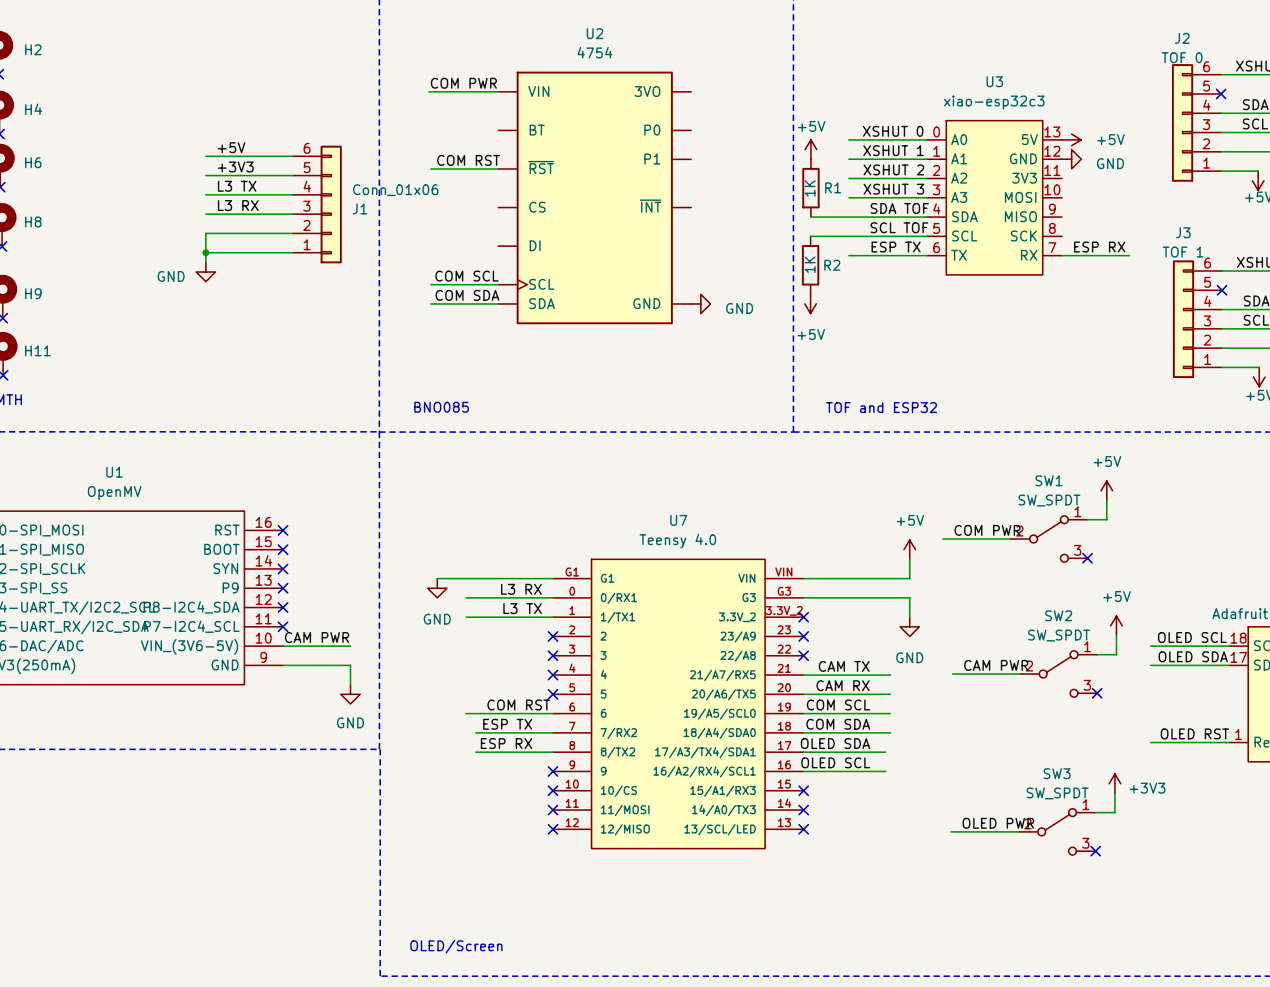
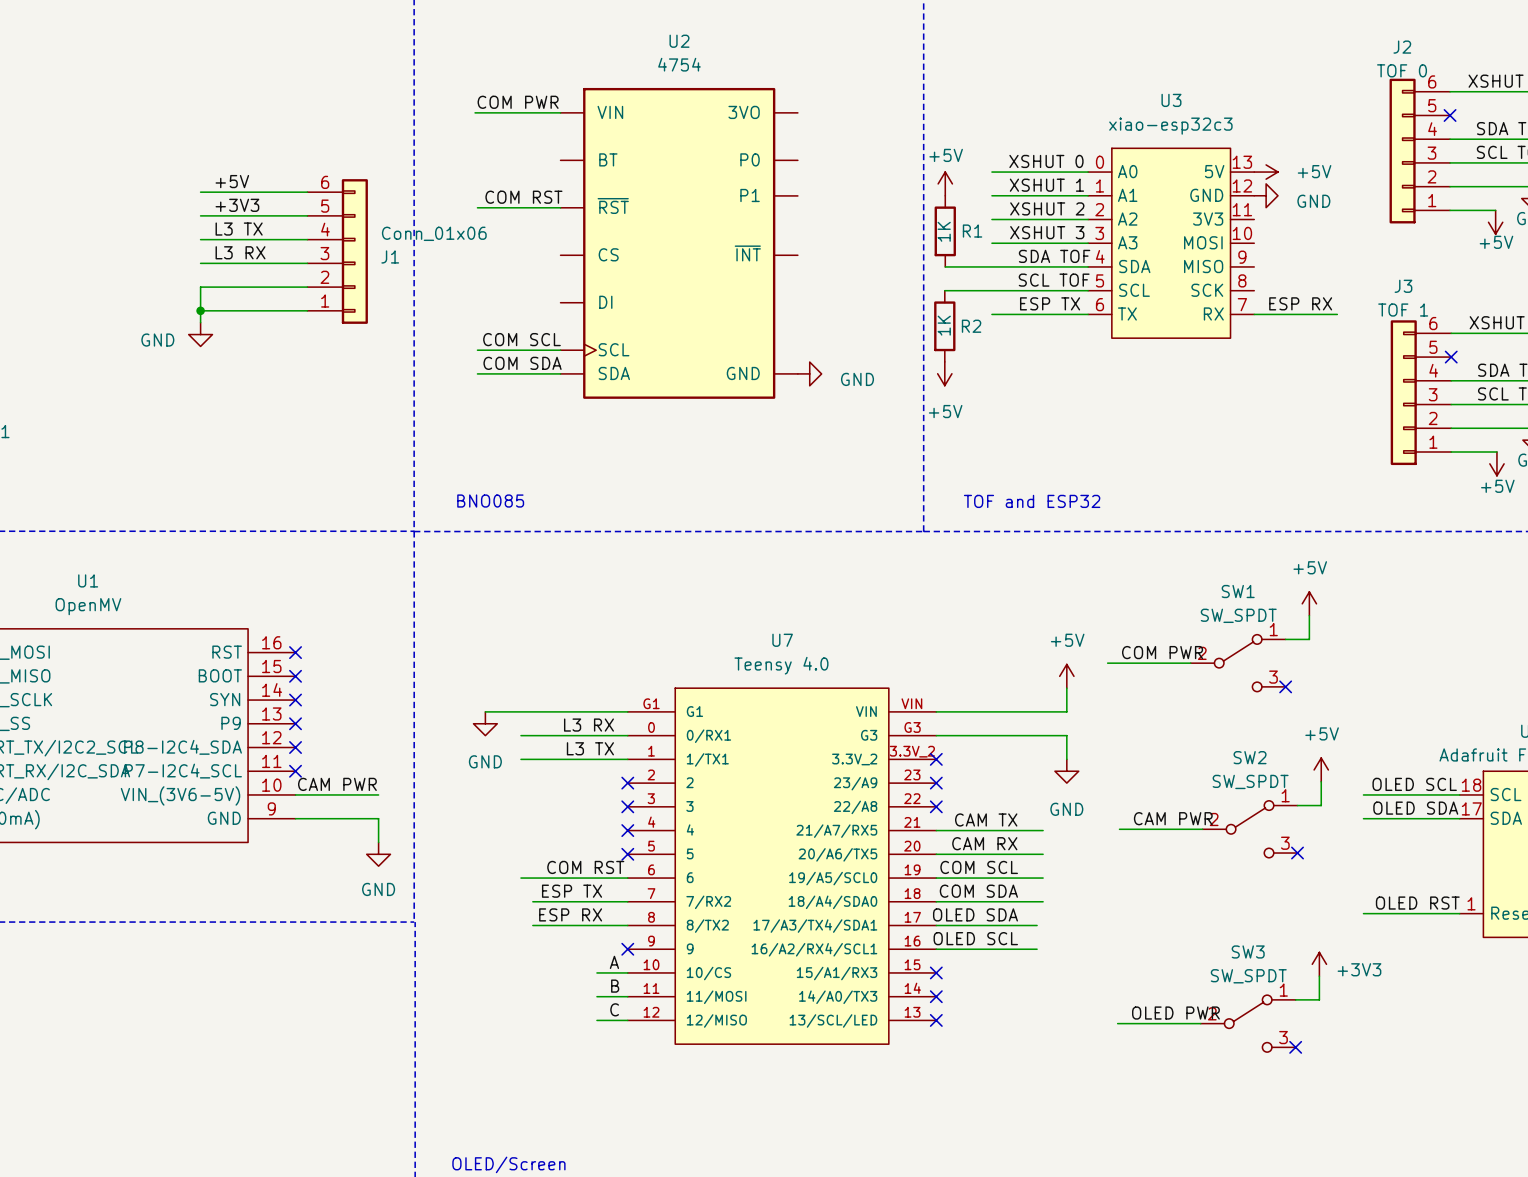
label: none -> A (614, 962)
wire: none -> (596, 972) (627, 972)
no-connect mark: (552, 790) -> none
label: none -> B (615, 986)
wire: none -> (596, 996) (627, 996)
no-connect mark: (552, 810) -> none
label: none -> C (614, 1009)
wire: none -> (596, 1020) (627, 1020)
no-connect mark: (552, 829) -> none

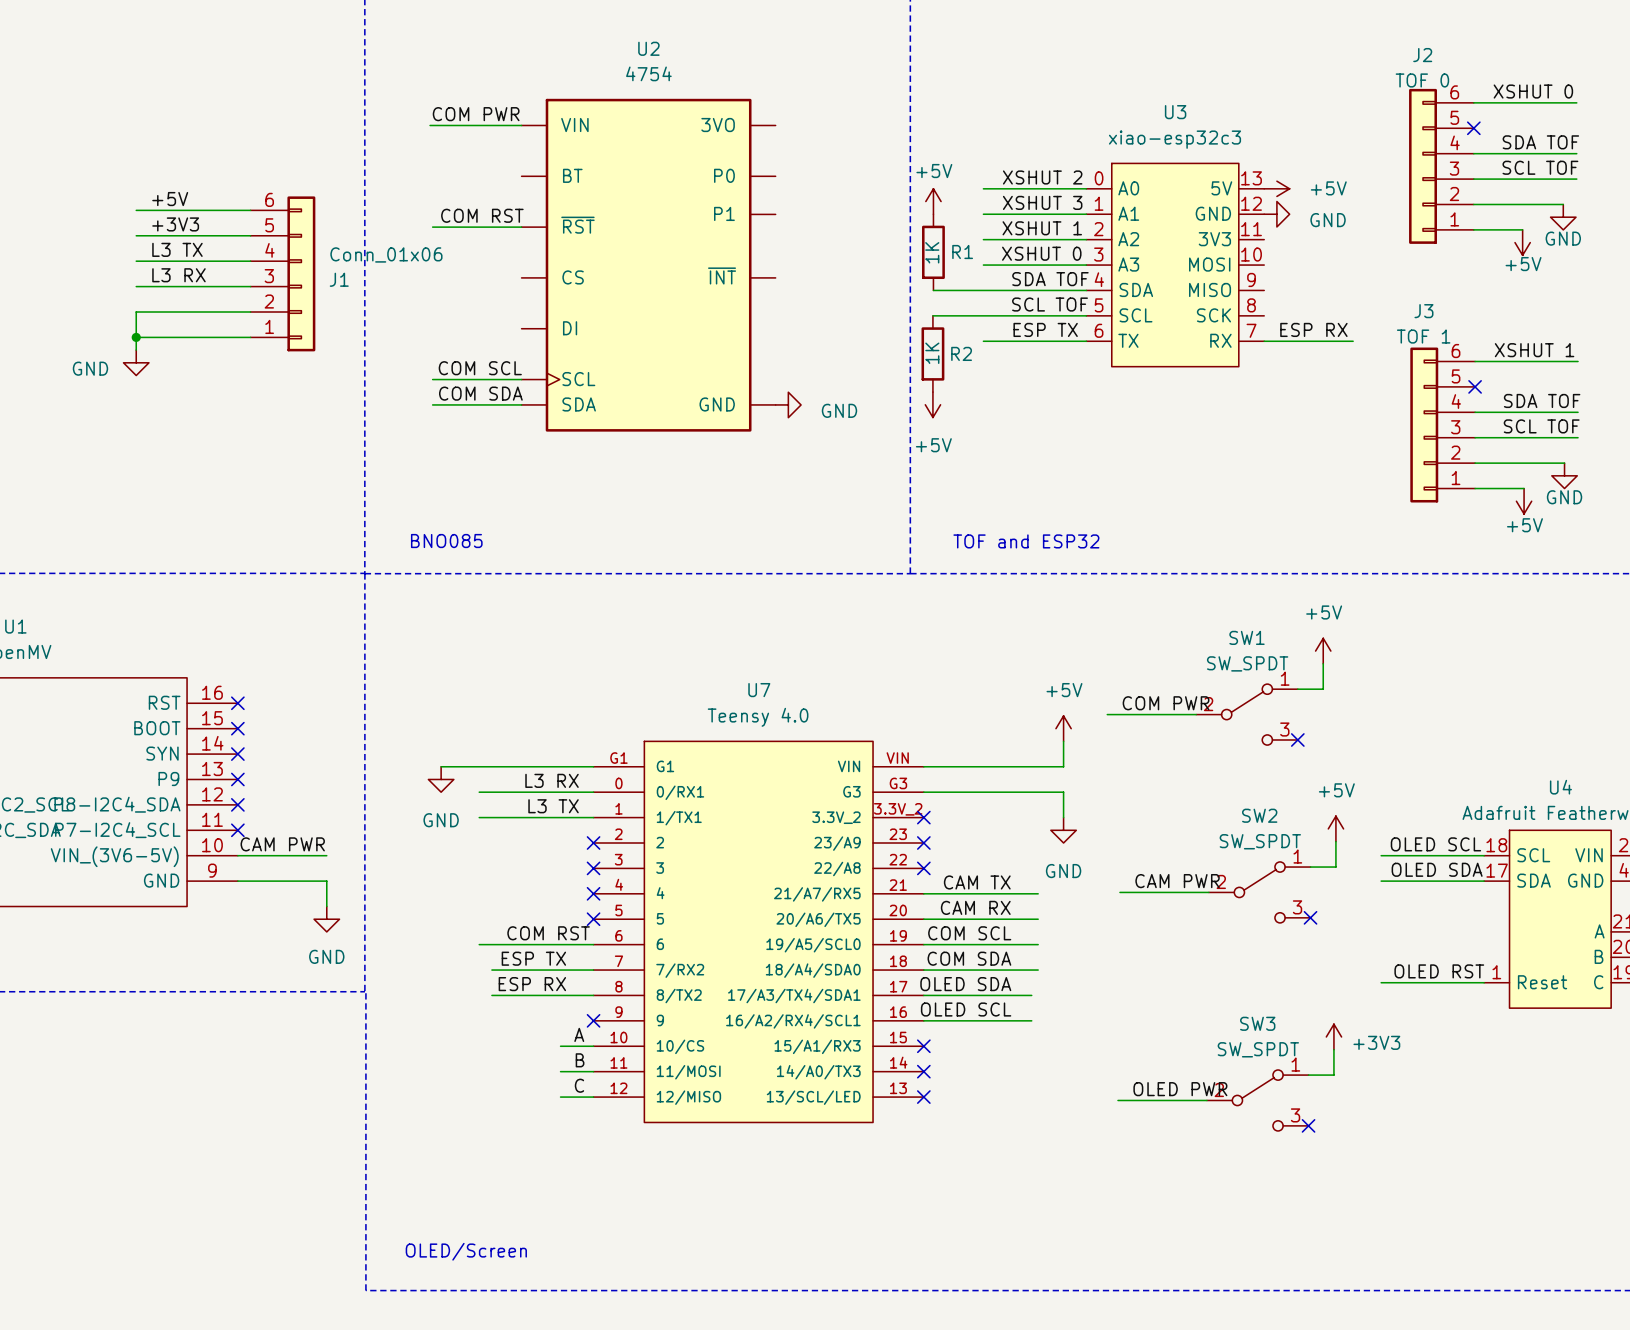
label: XSHUT 0 (1046, 161) -> XSHUT 2 (1042, 177)
label: XSHUT 1 (1046, 185) -> XSHUT 3 (1042, 202)
label: XSHUT 2 (1047, 208) -> XSHUT 1 (1042, 228)
label: XSHUT 3 (1047, 232) -> XSHUT 0 (1041, 253)

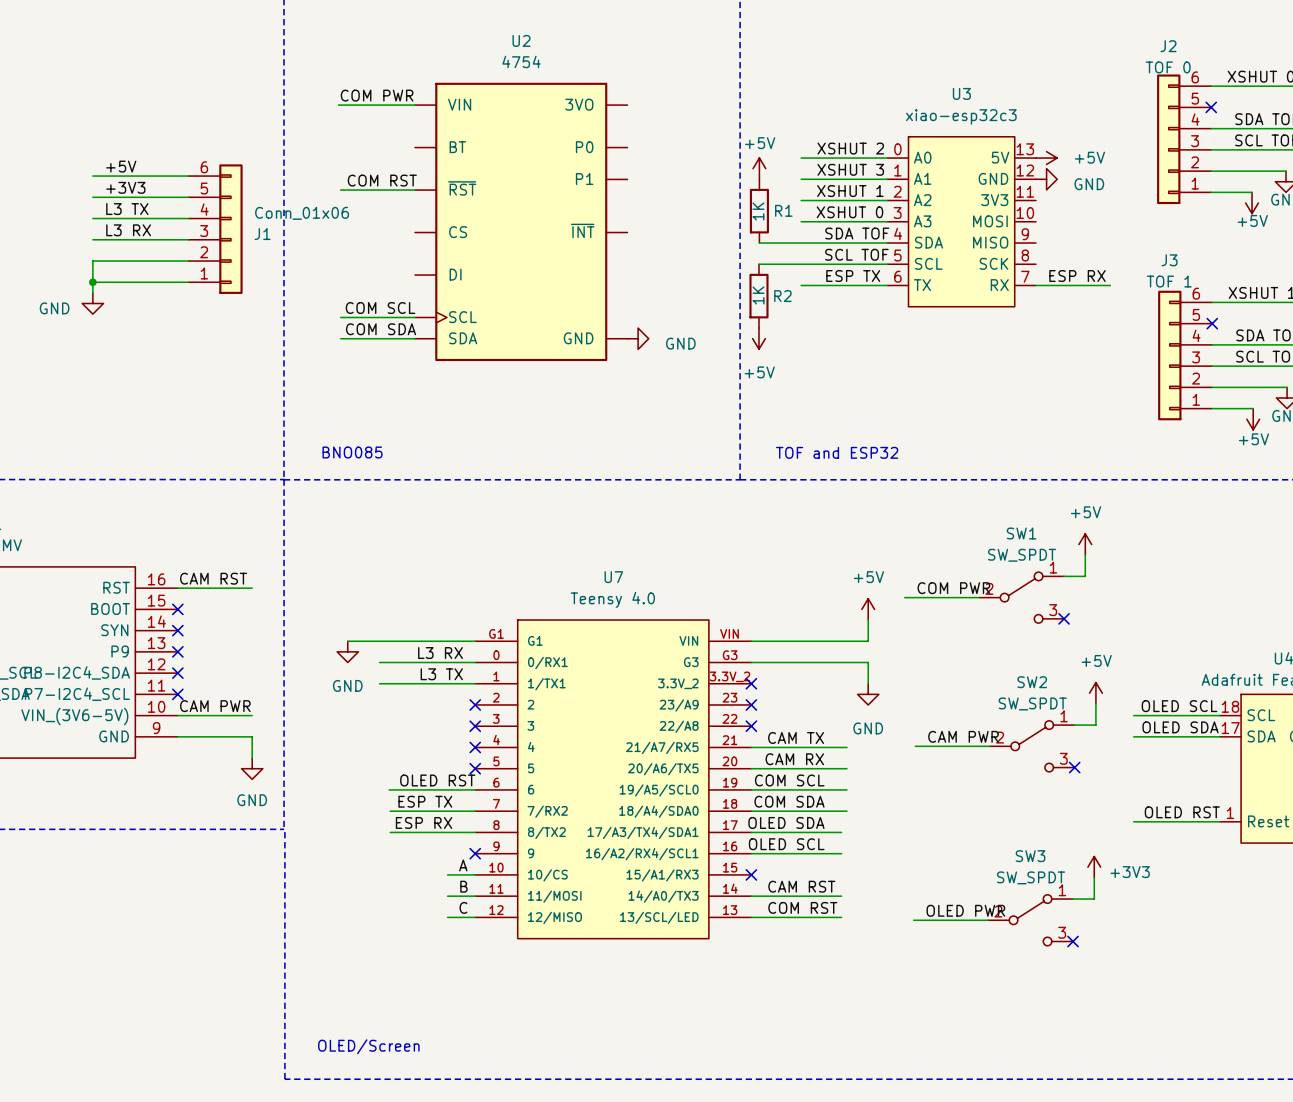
label: none -> CAM RST (213, 578)
wire: none -> (177, 588) (252, 588)
no-connect mark: (237, 703) -> none
label: COM RST (548, 933) -> OLED RST (437, 780)
wire: (479, 944) (490, 944) -> none
label: none -> CAM RST (801, 886)
wire: none -> (751, 896) (841, 896)
no-connect mark: (923, 1071) -> none
label: none -> COM RST (802, 907)
wire: none -> (751, 917) (841, 917)
no-connect mark: (923, 1097) -> none

